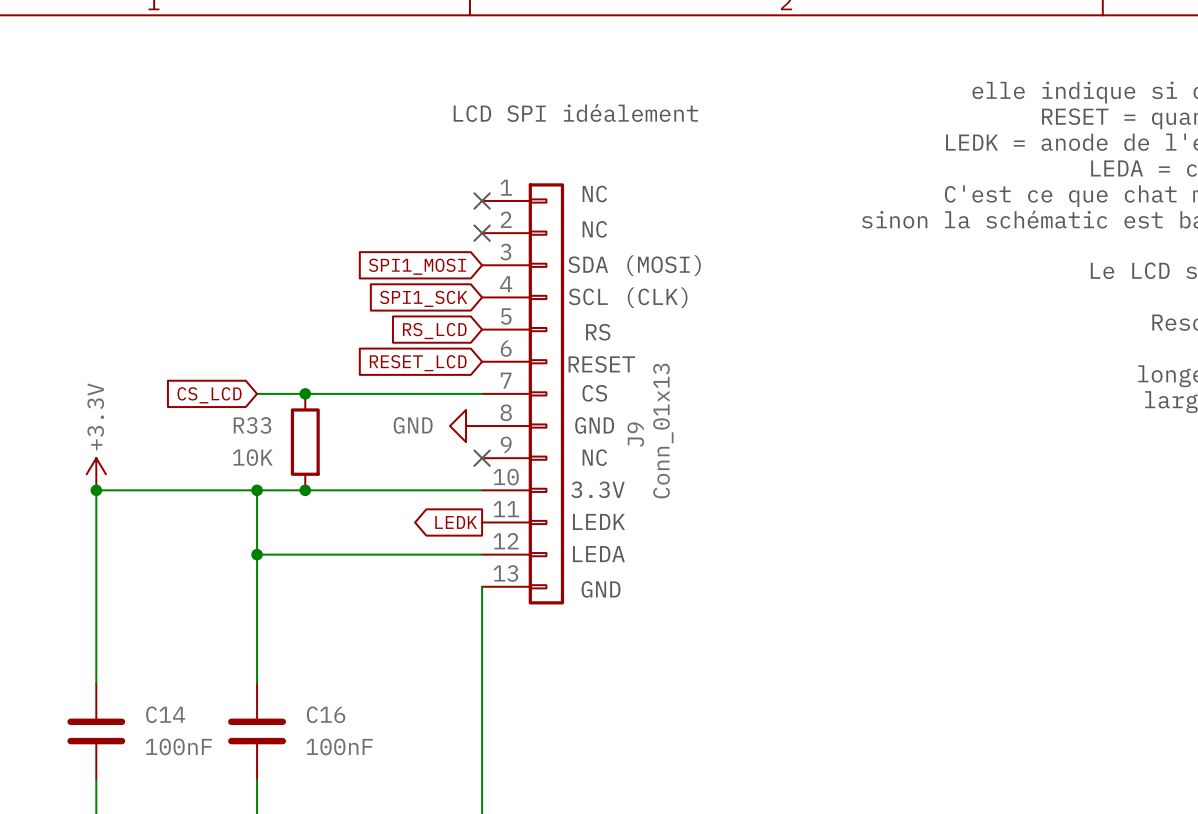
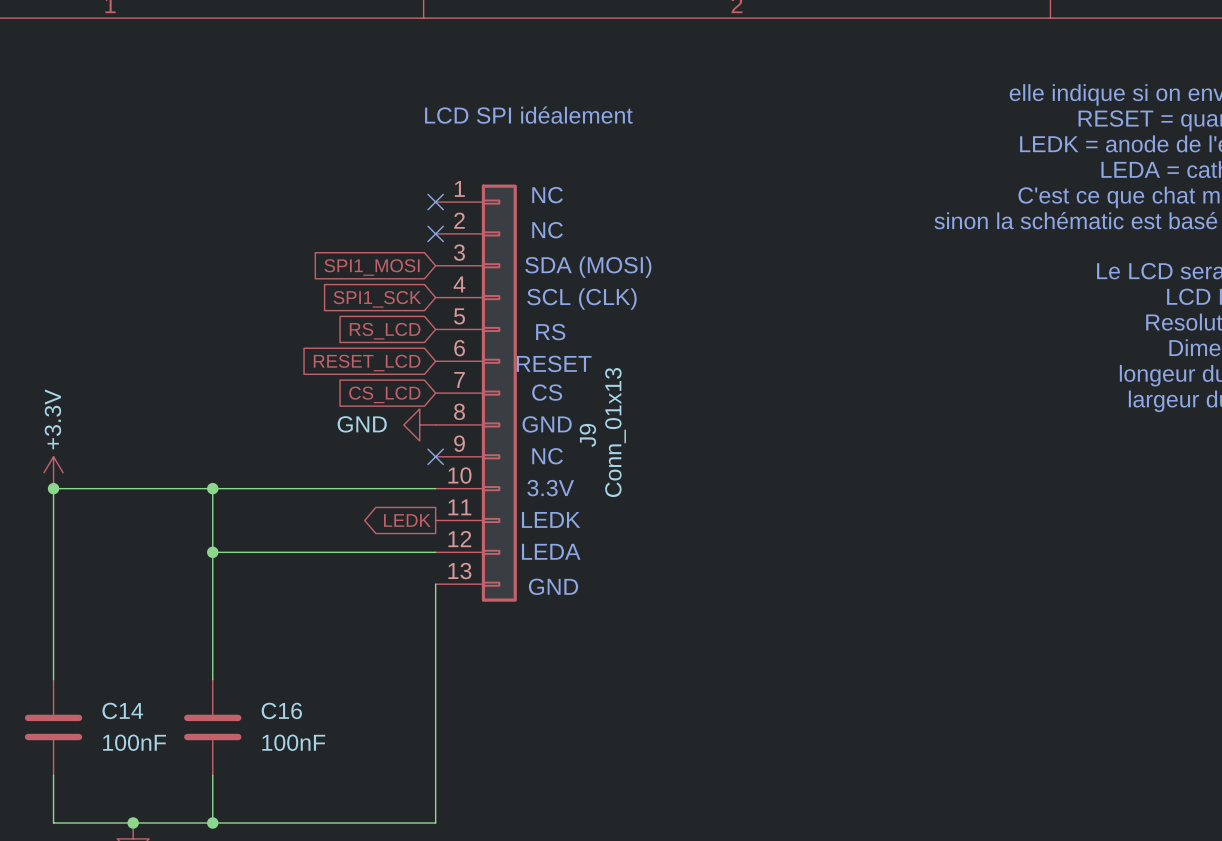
wire: (257, 393) (482, 393) -> none
junction: (305, 393) -> none
global label position: CS_LCD (209, 395) -> CS_LCD (384, 394)
R33: 10K (305, 442) -> none
junction: (305, 490) -> none

